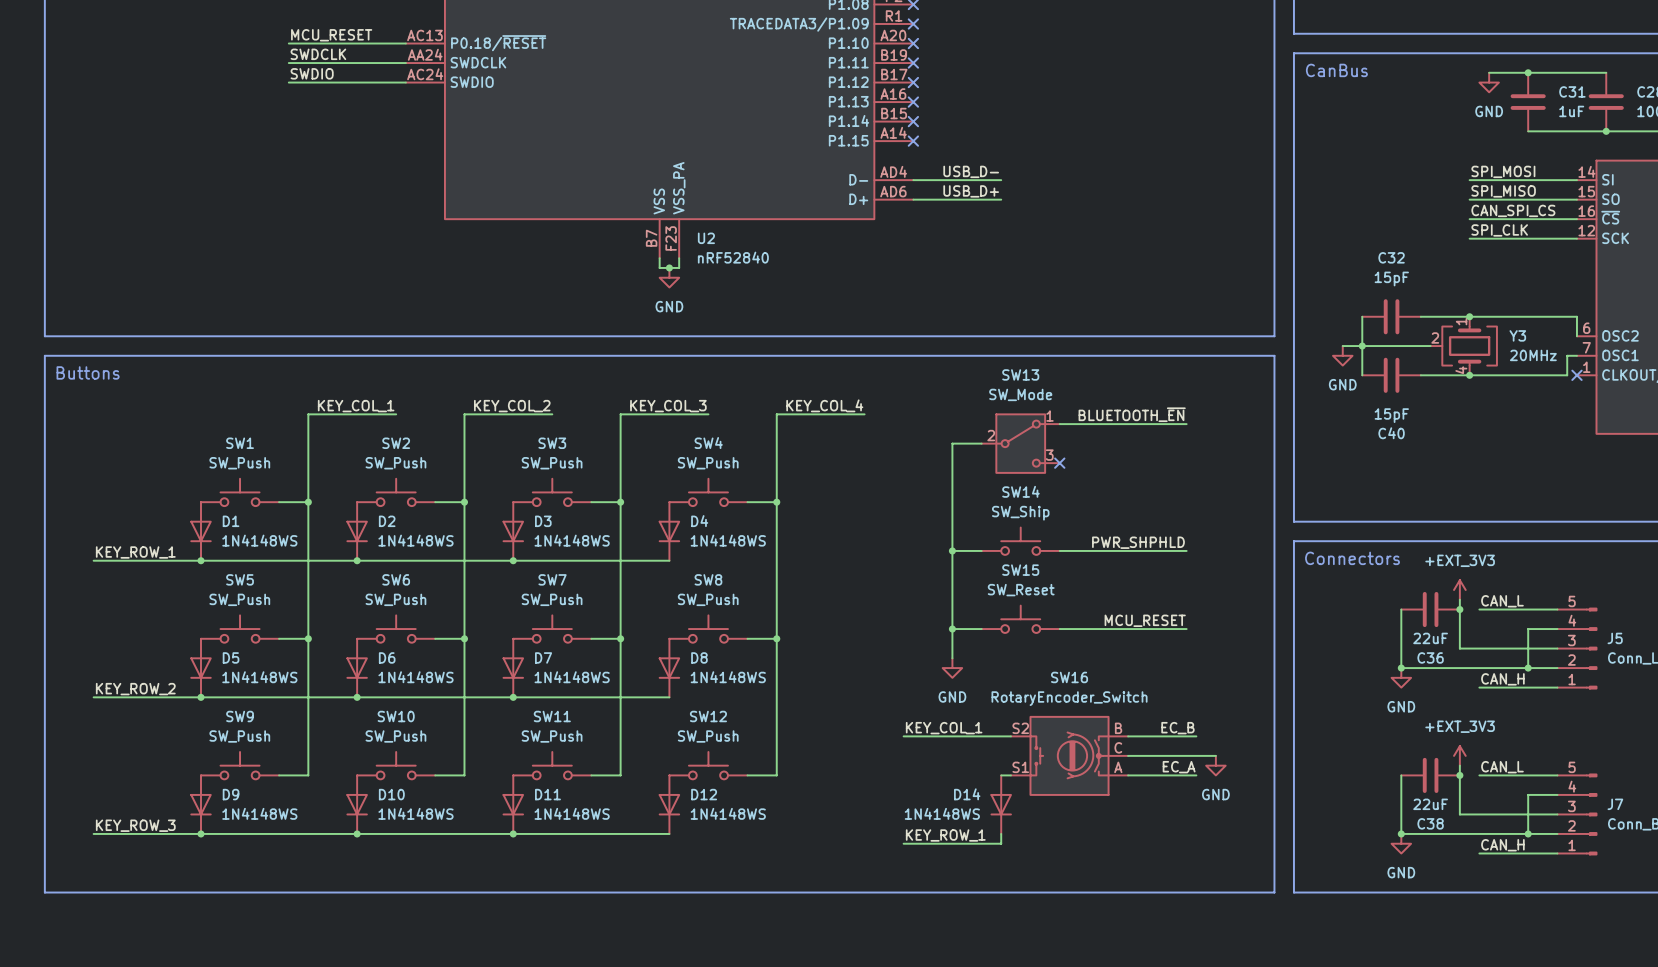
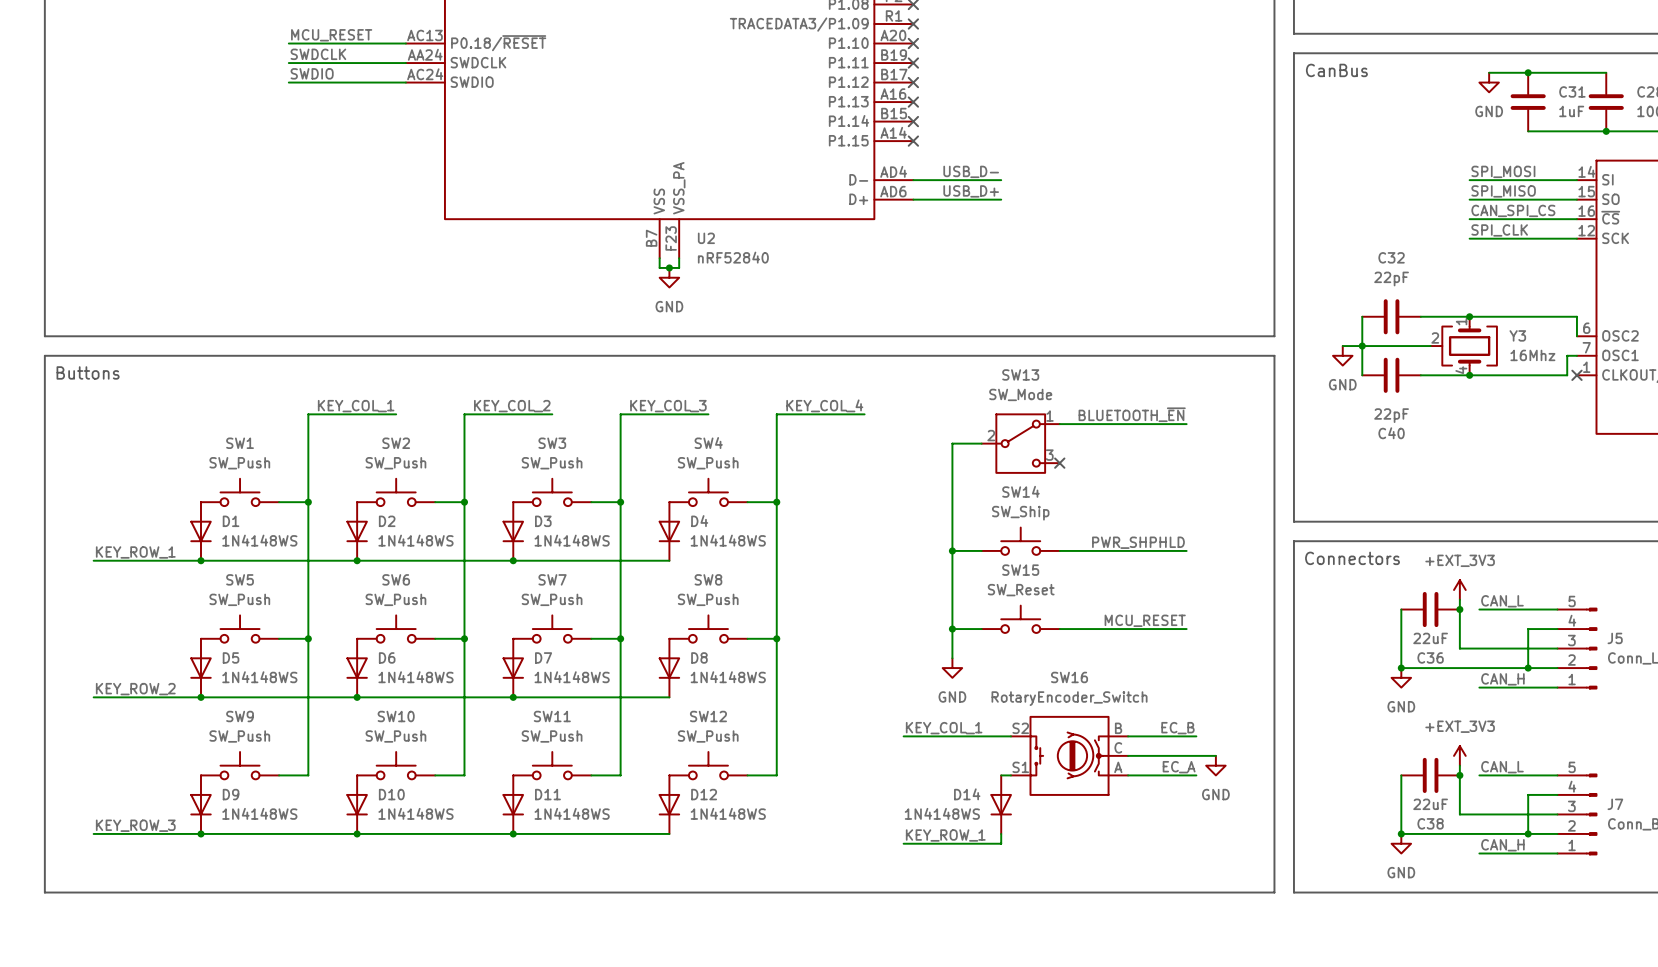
C32 value: 15pF (1391, 278) -> 22pF (1391, 278)
Y3 value: 20MHz (1533, 355) -> 16Mhz (1532, 355)
C40 value: 15pF (1391, 415) -> 22pF (1391, 415)

